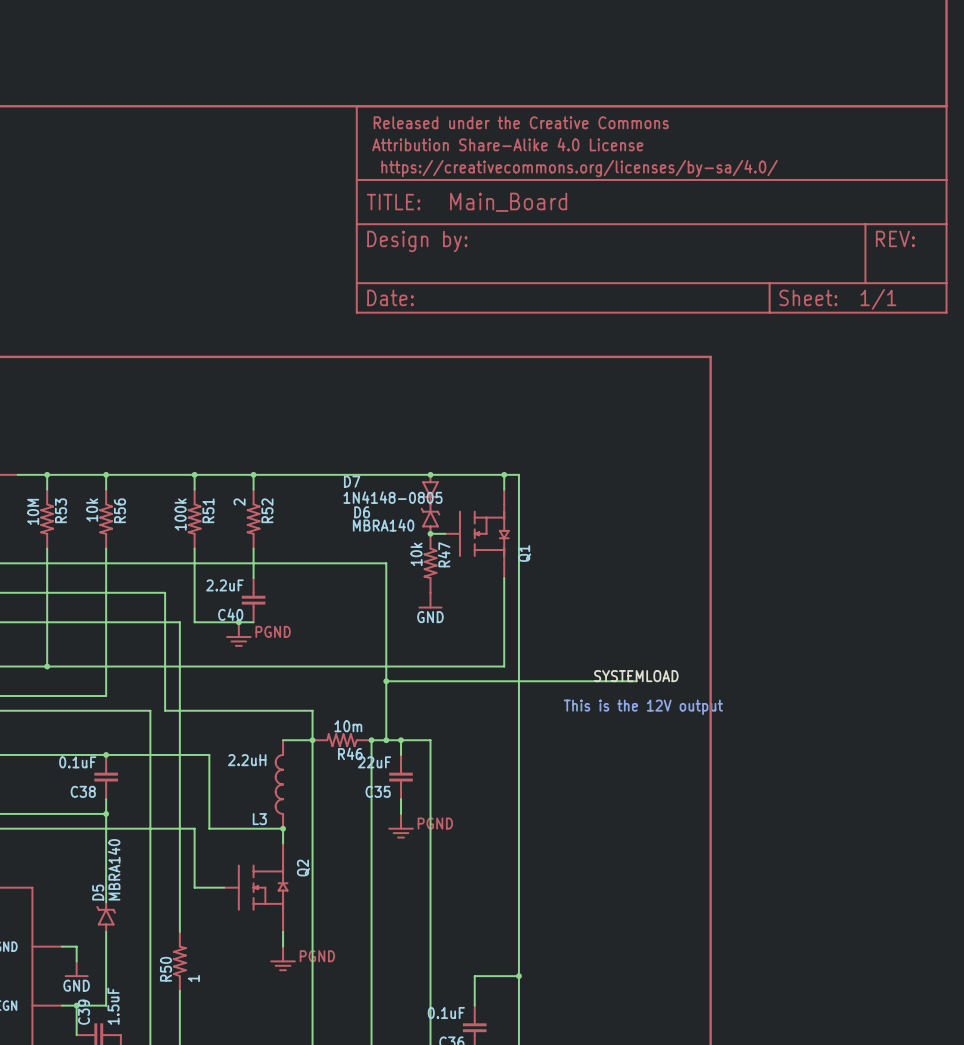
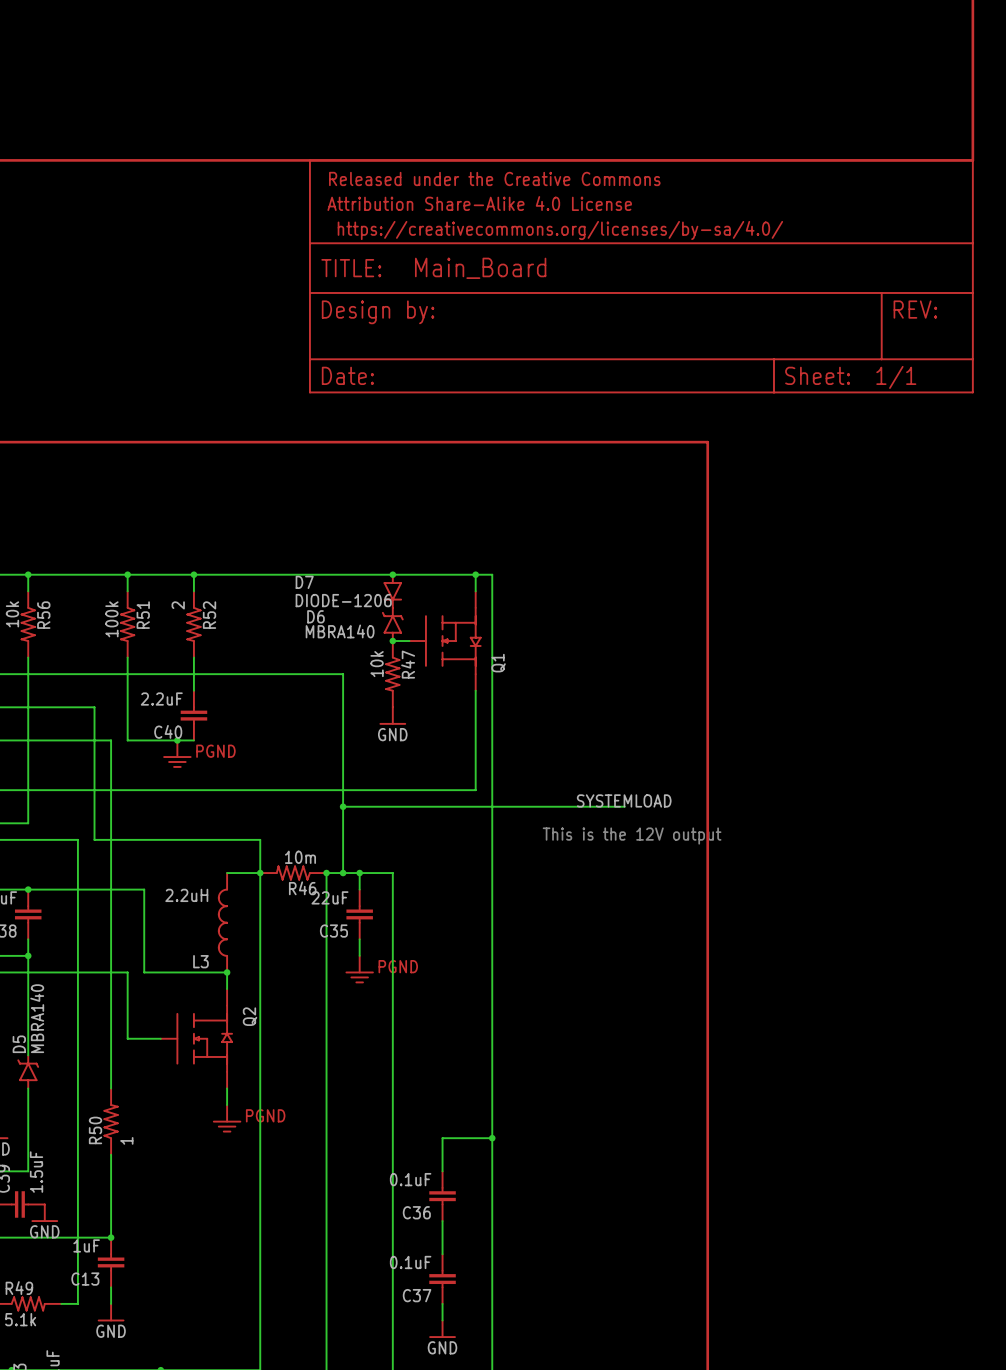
D7 value: 1N4148-0805 (393, 497) -> DIODE-1206 (343, 600)

